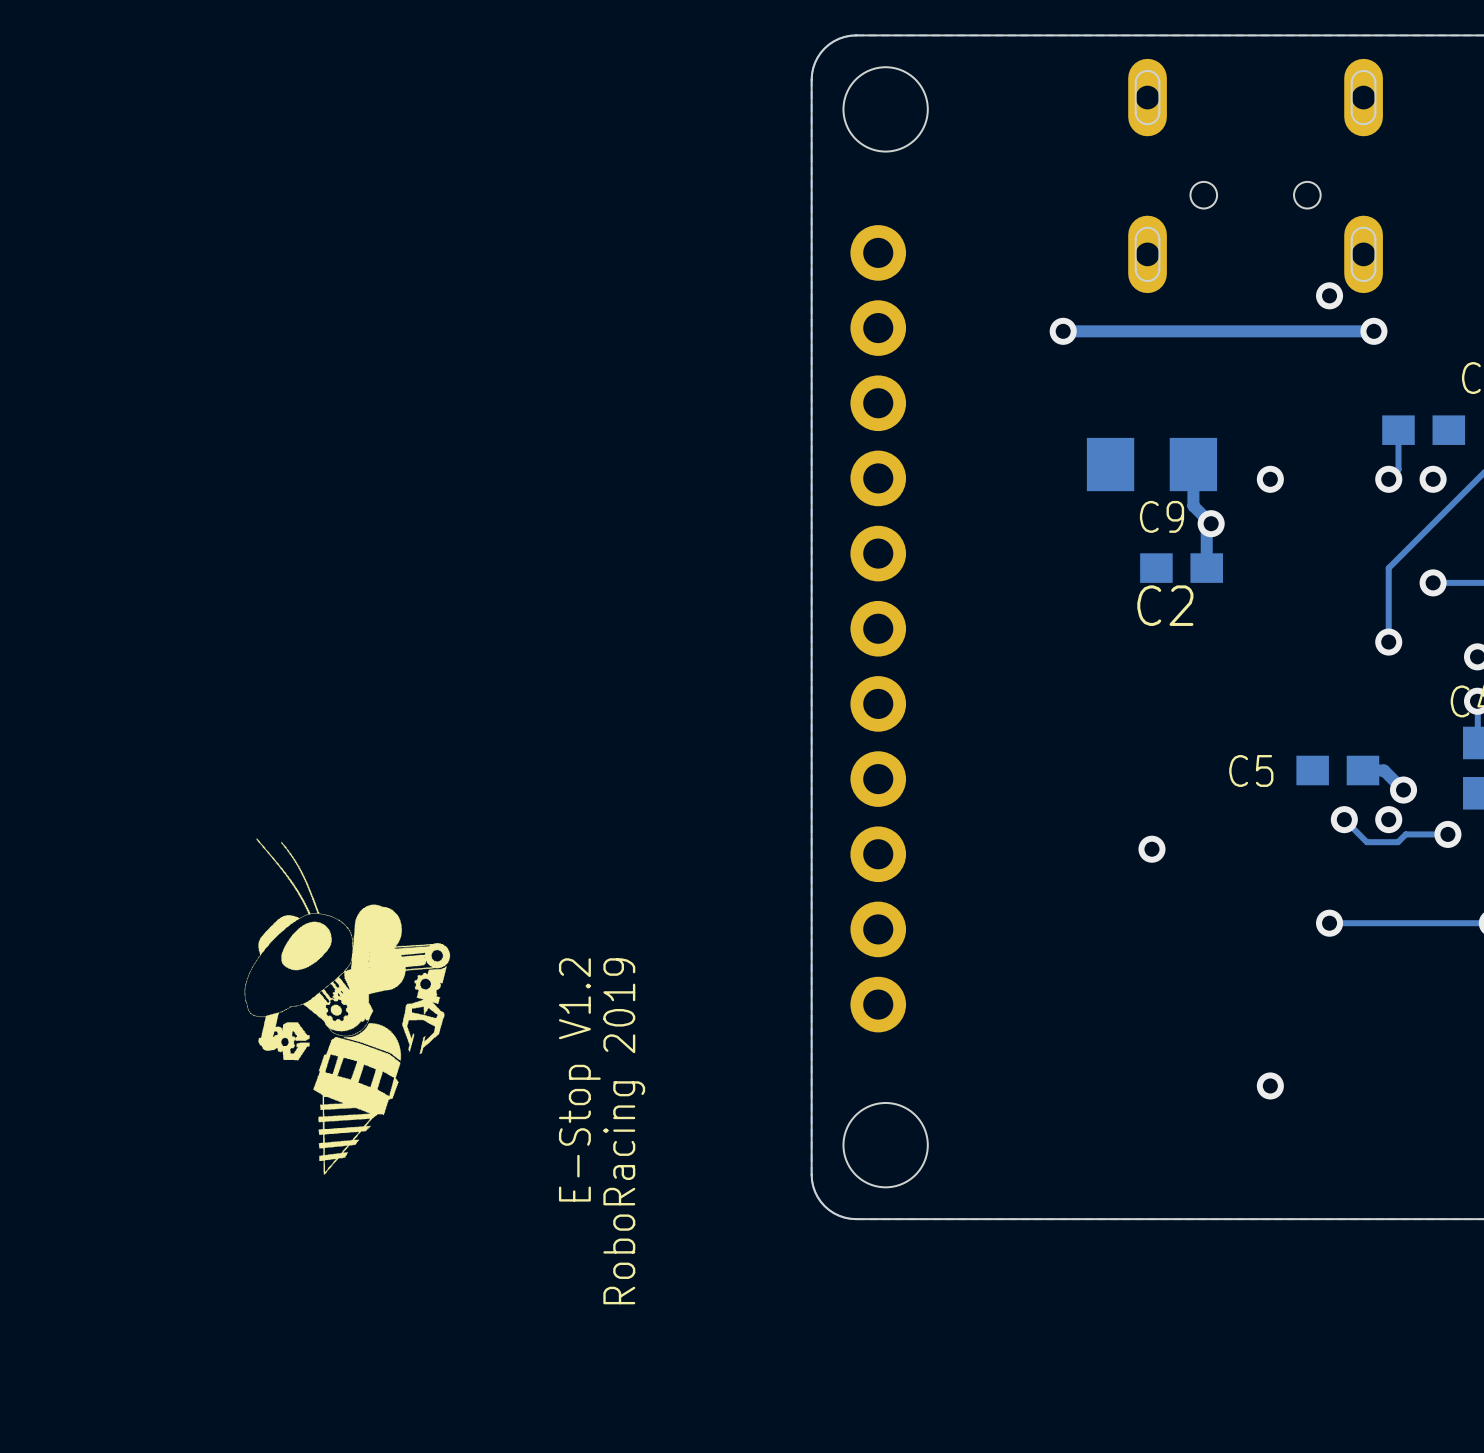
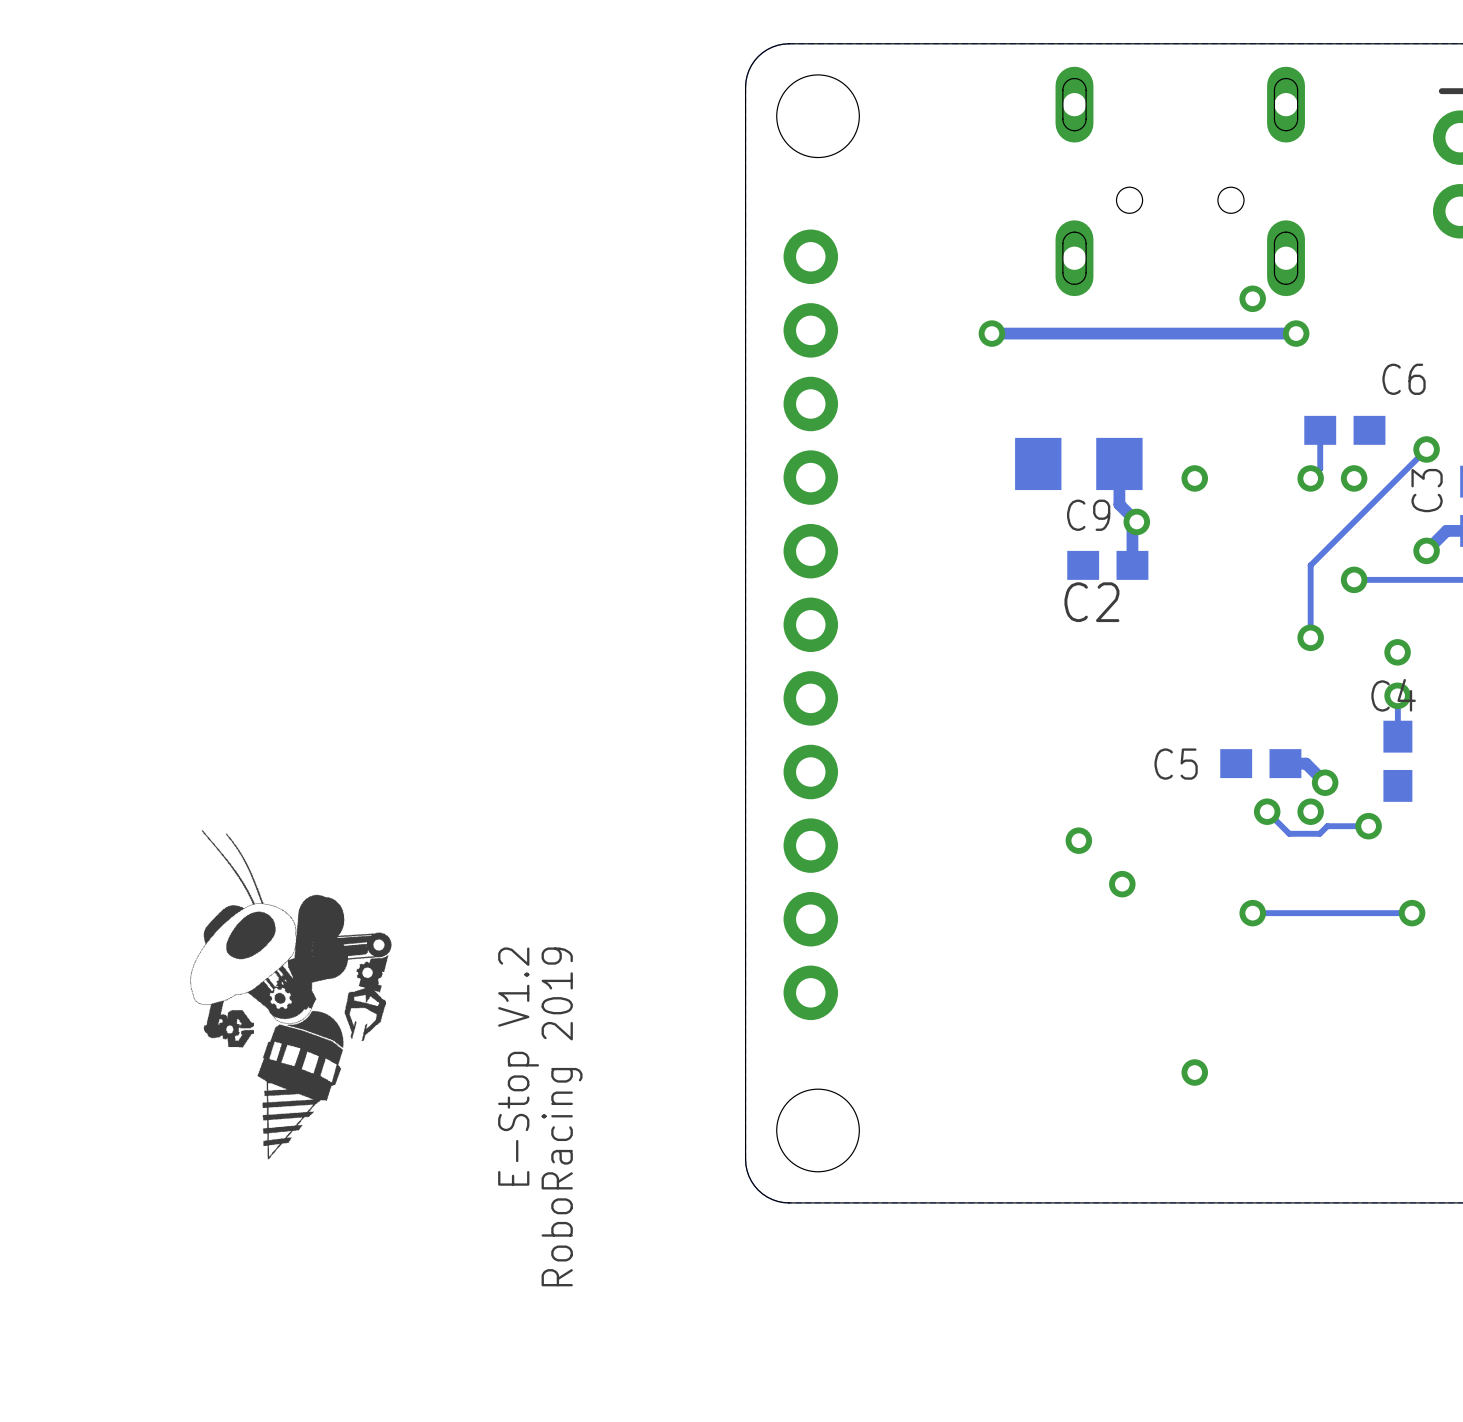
via: none -> (1122, 884)

